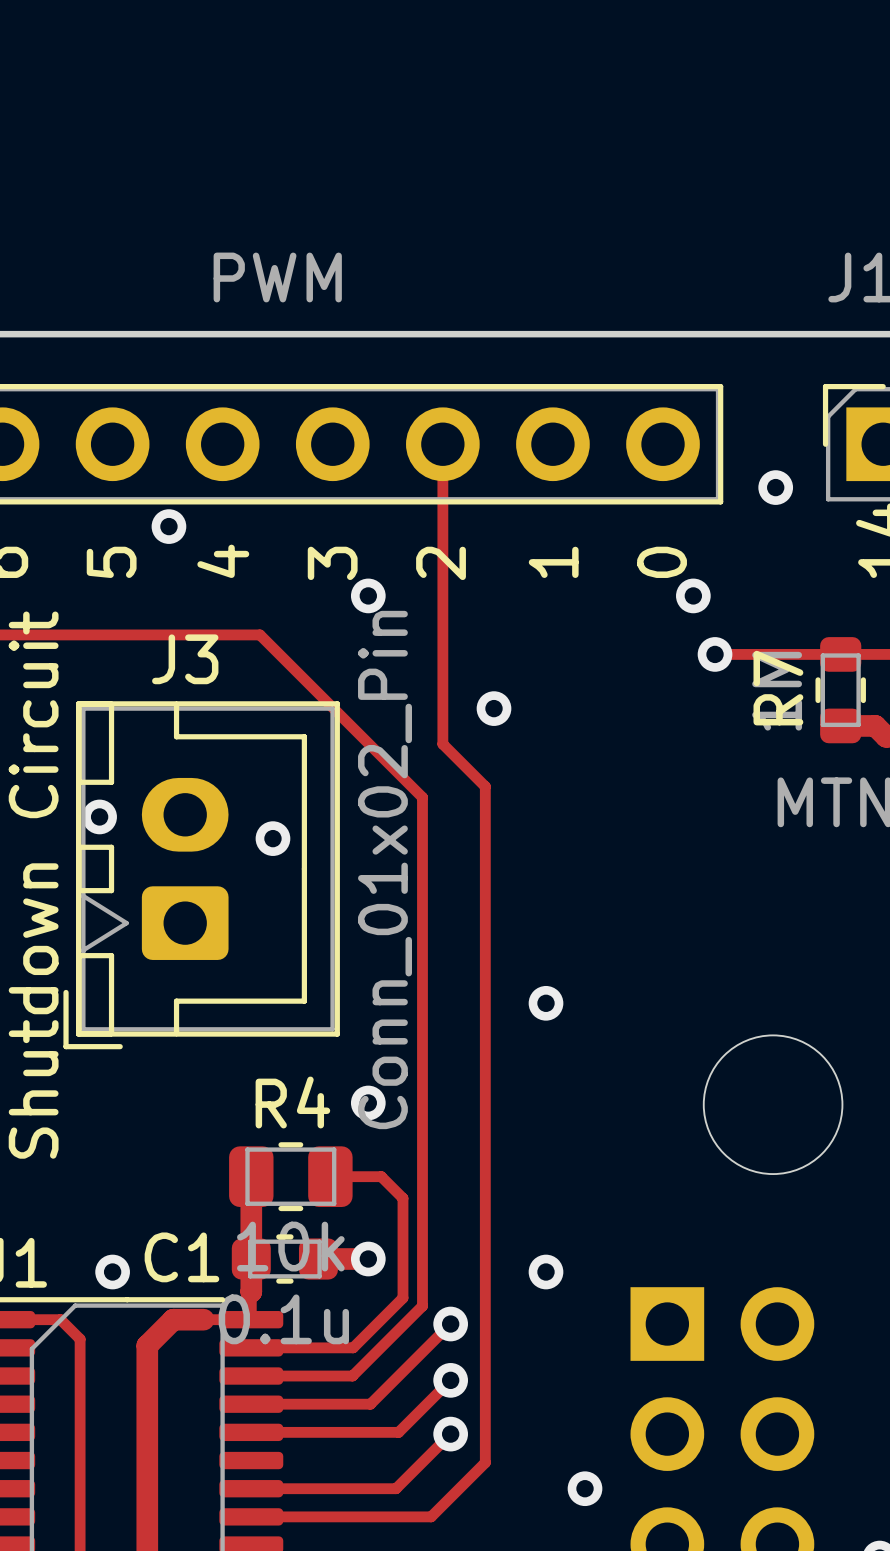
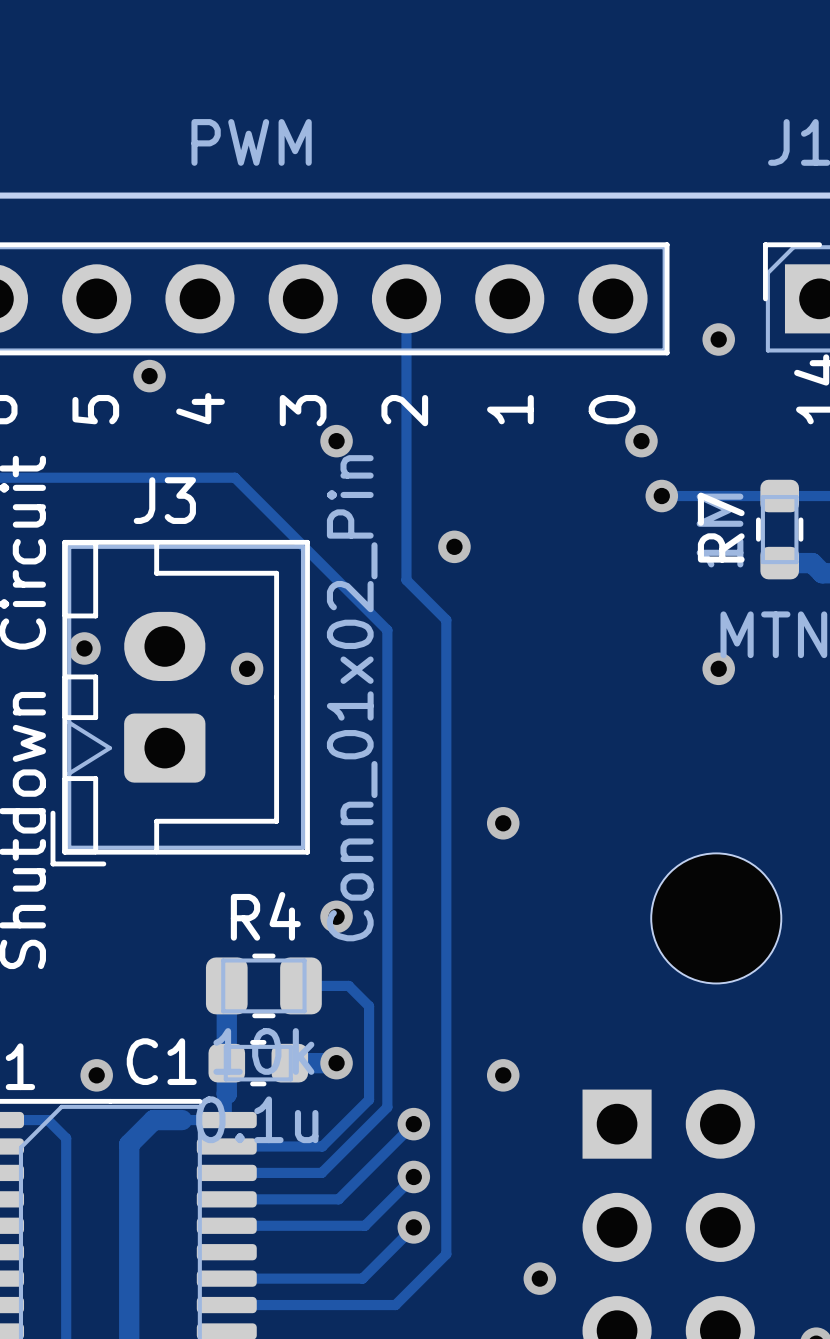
via: none -> (718, 668)

